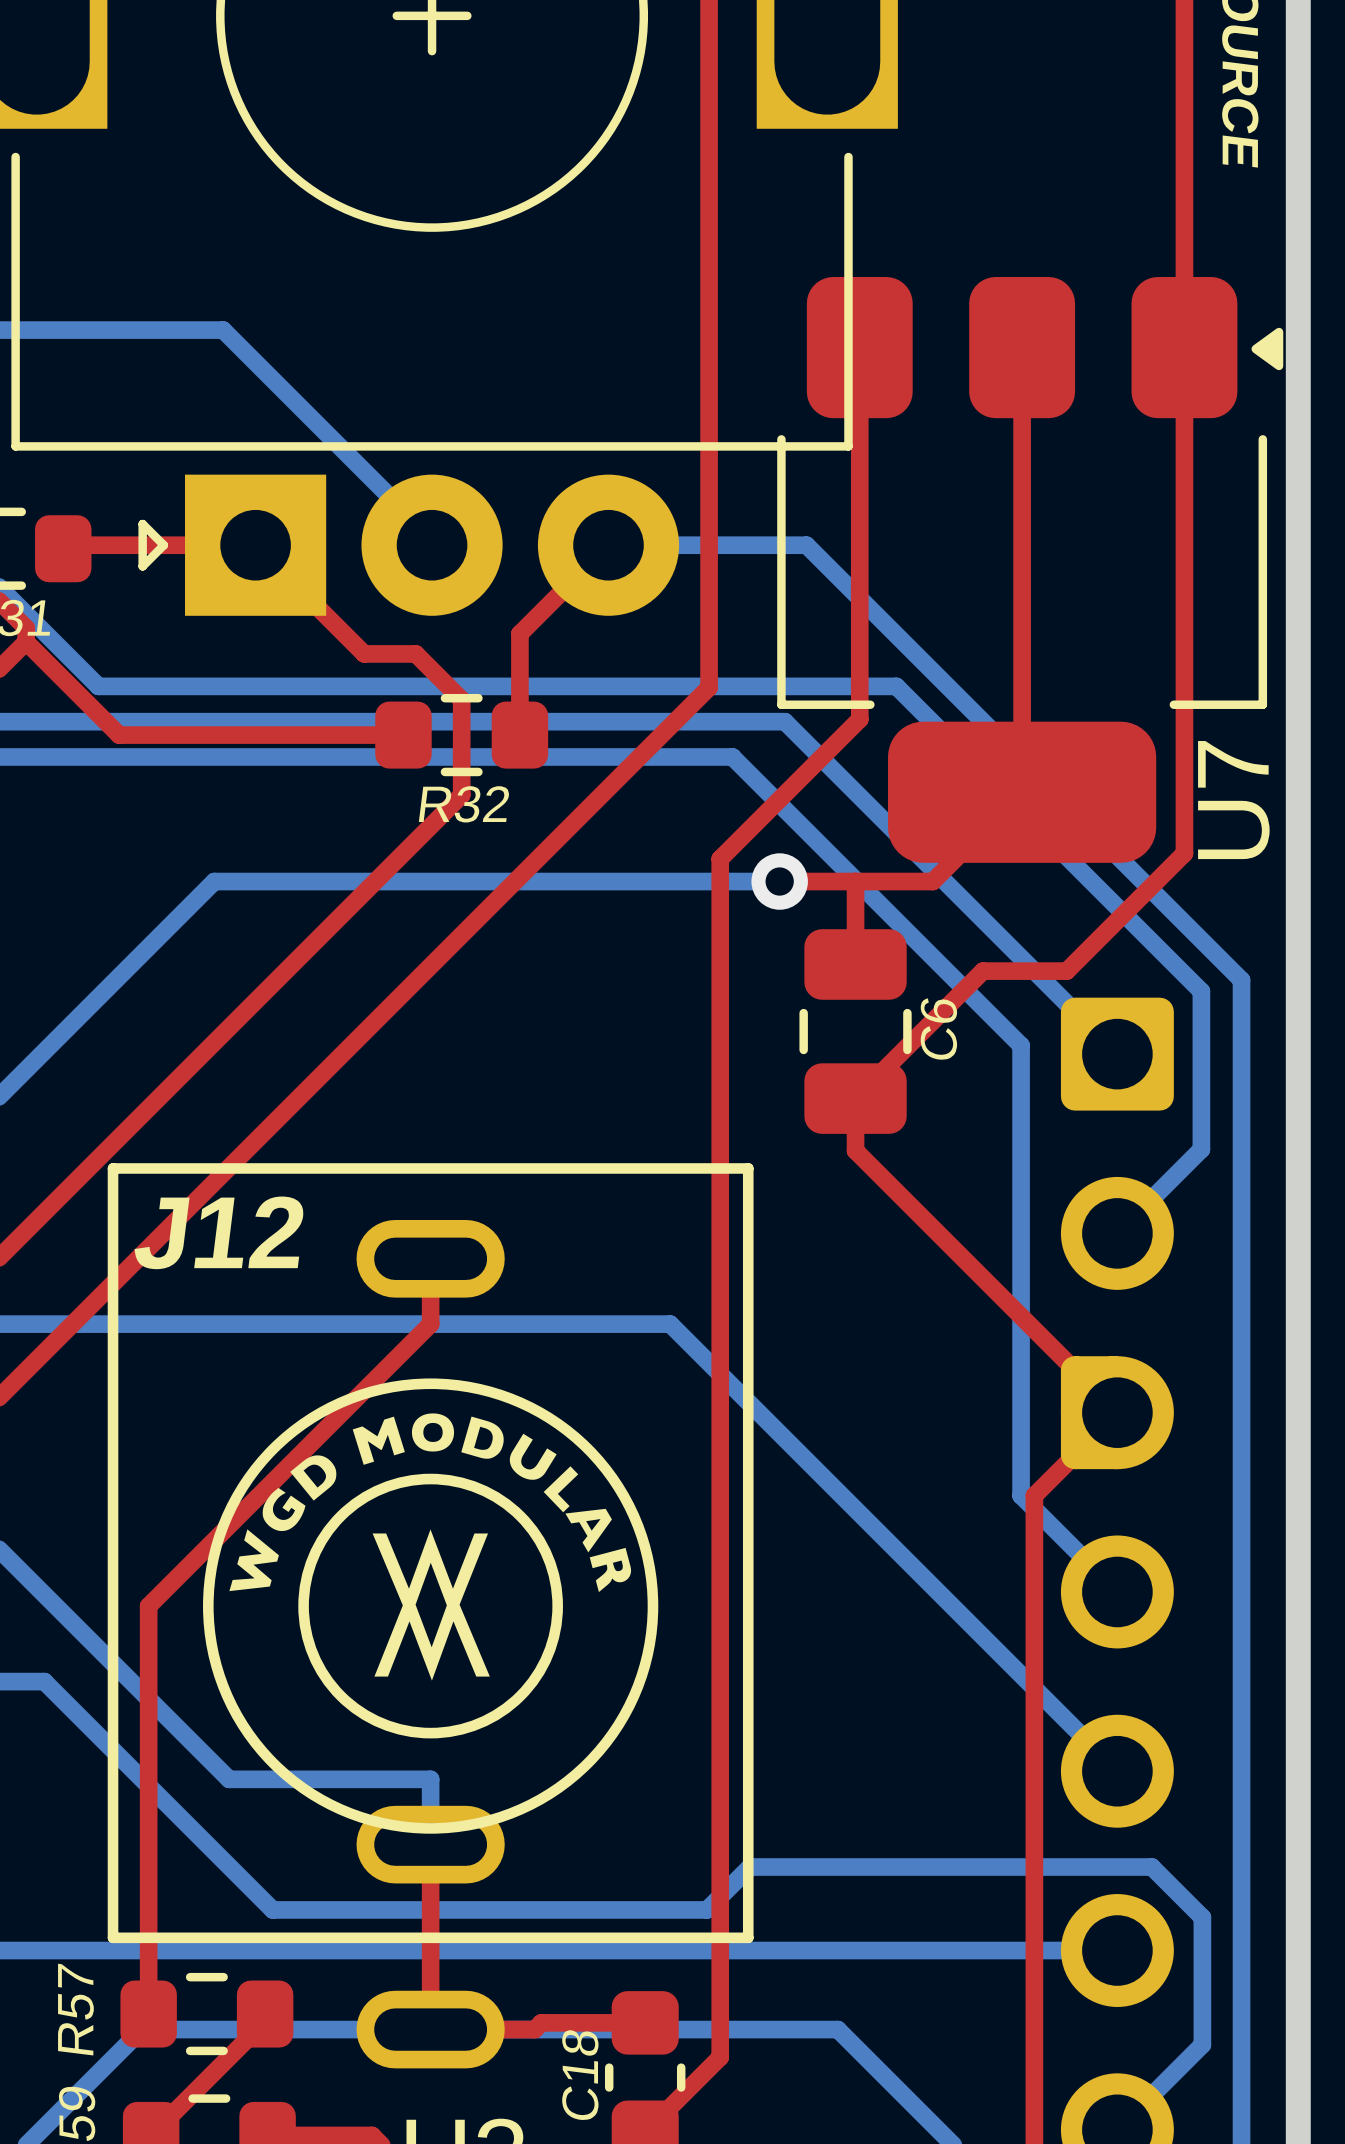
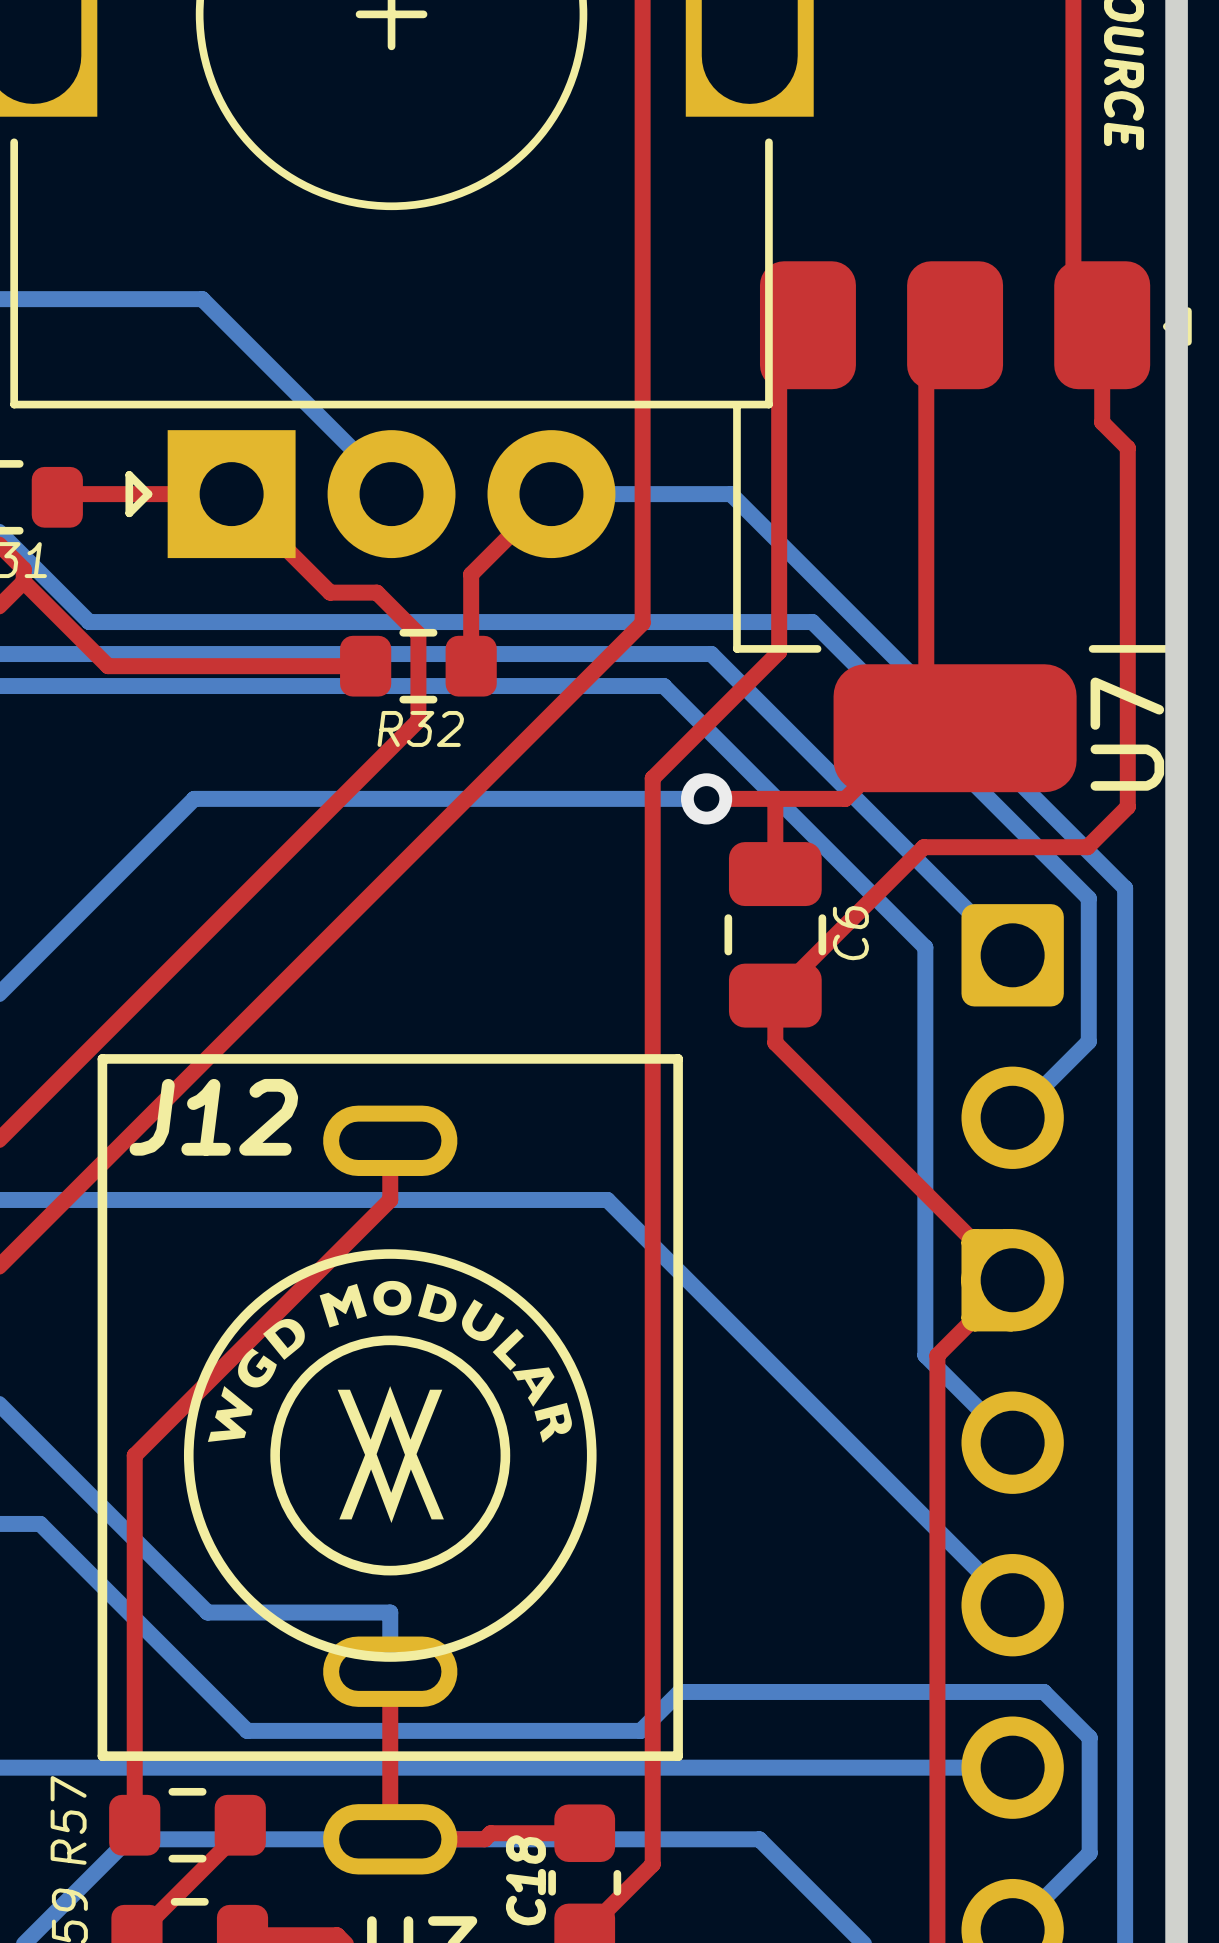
top track: (1184, 347) (1184, 853) (1066, 971) (983, 971) -> (1102, 325) (1102, 422) (1127, 448) (1127, 806) (1087, 847) (923, 847) (890, 880)
U7 position: (1030, 569) -> (962, 526)
U7 name position: U7 (1233, 800) -> U7 (1127, 734)

